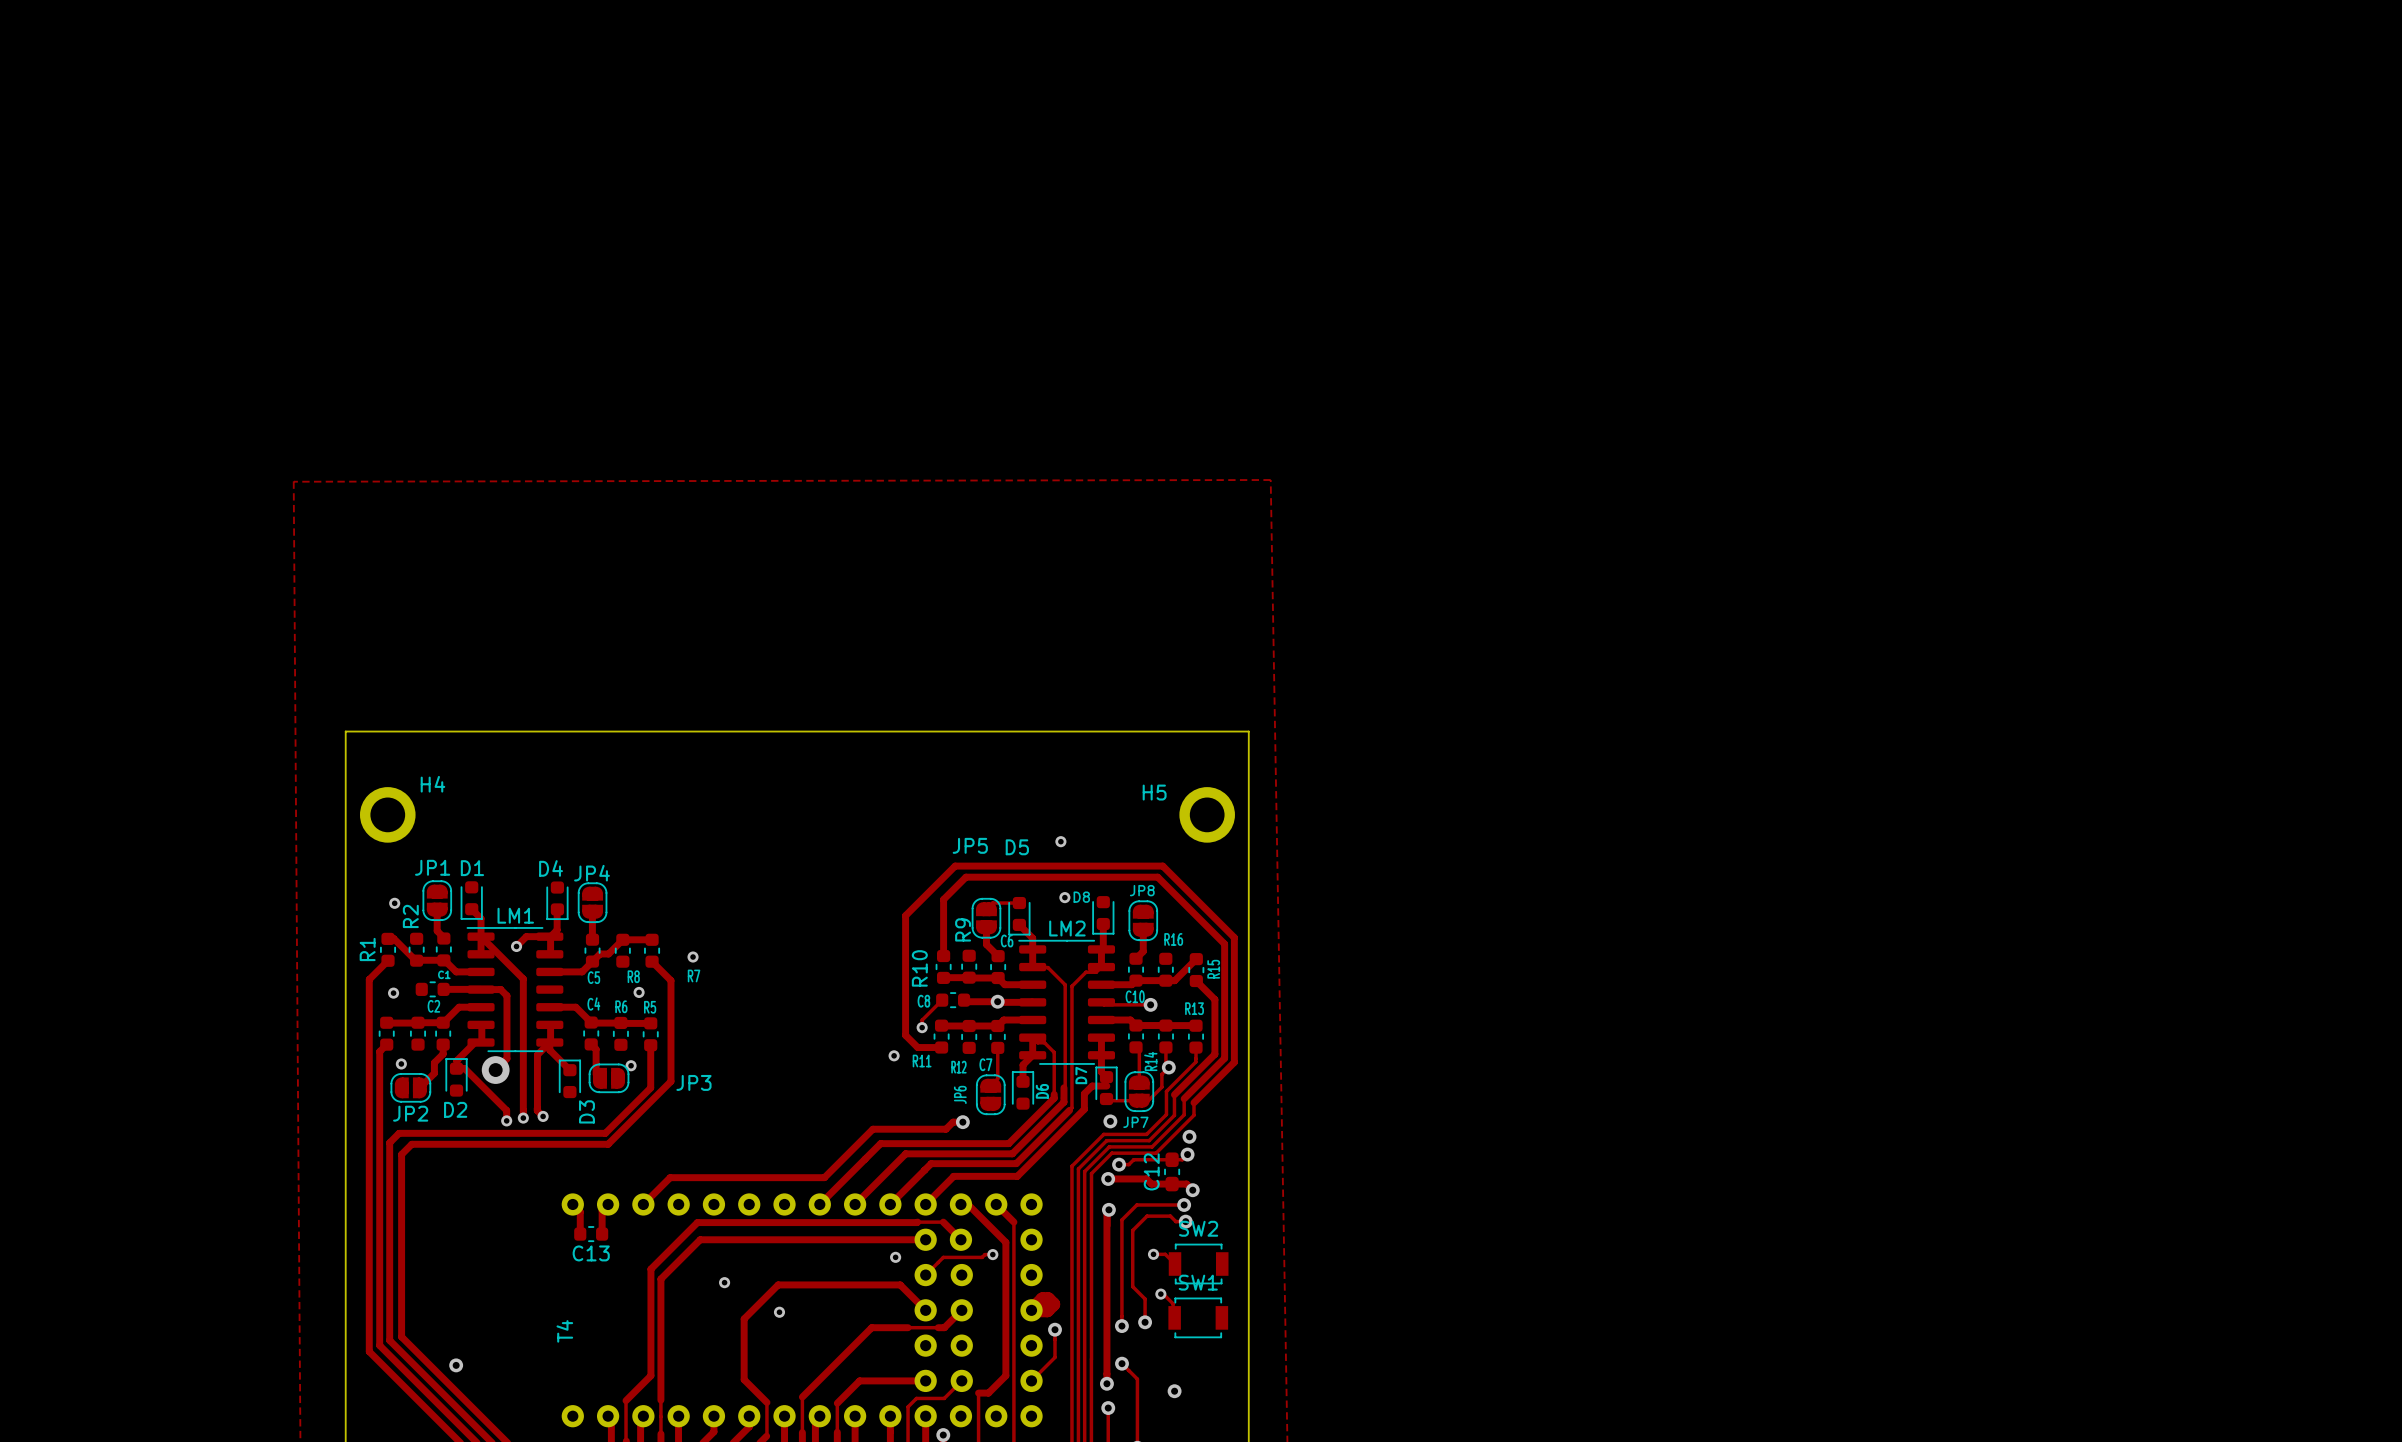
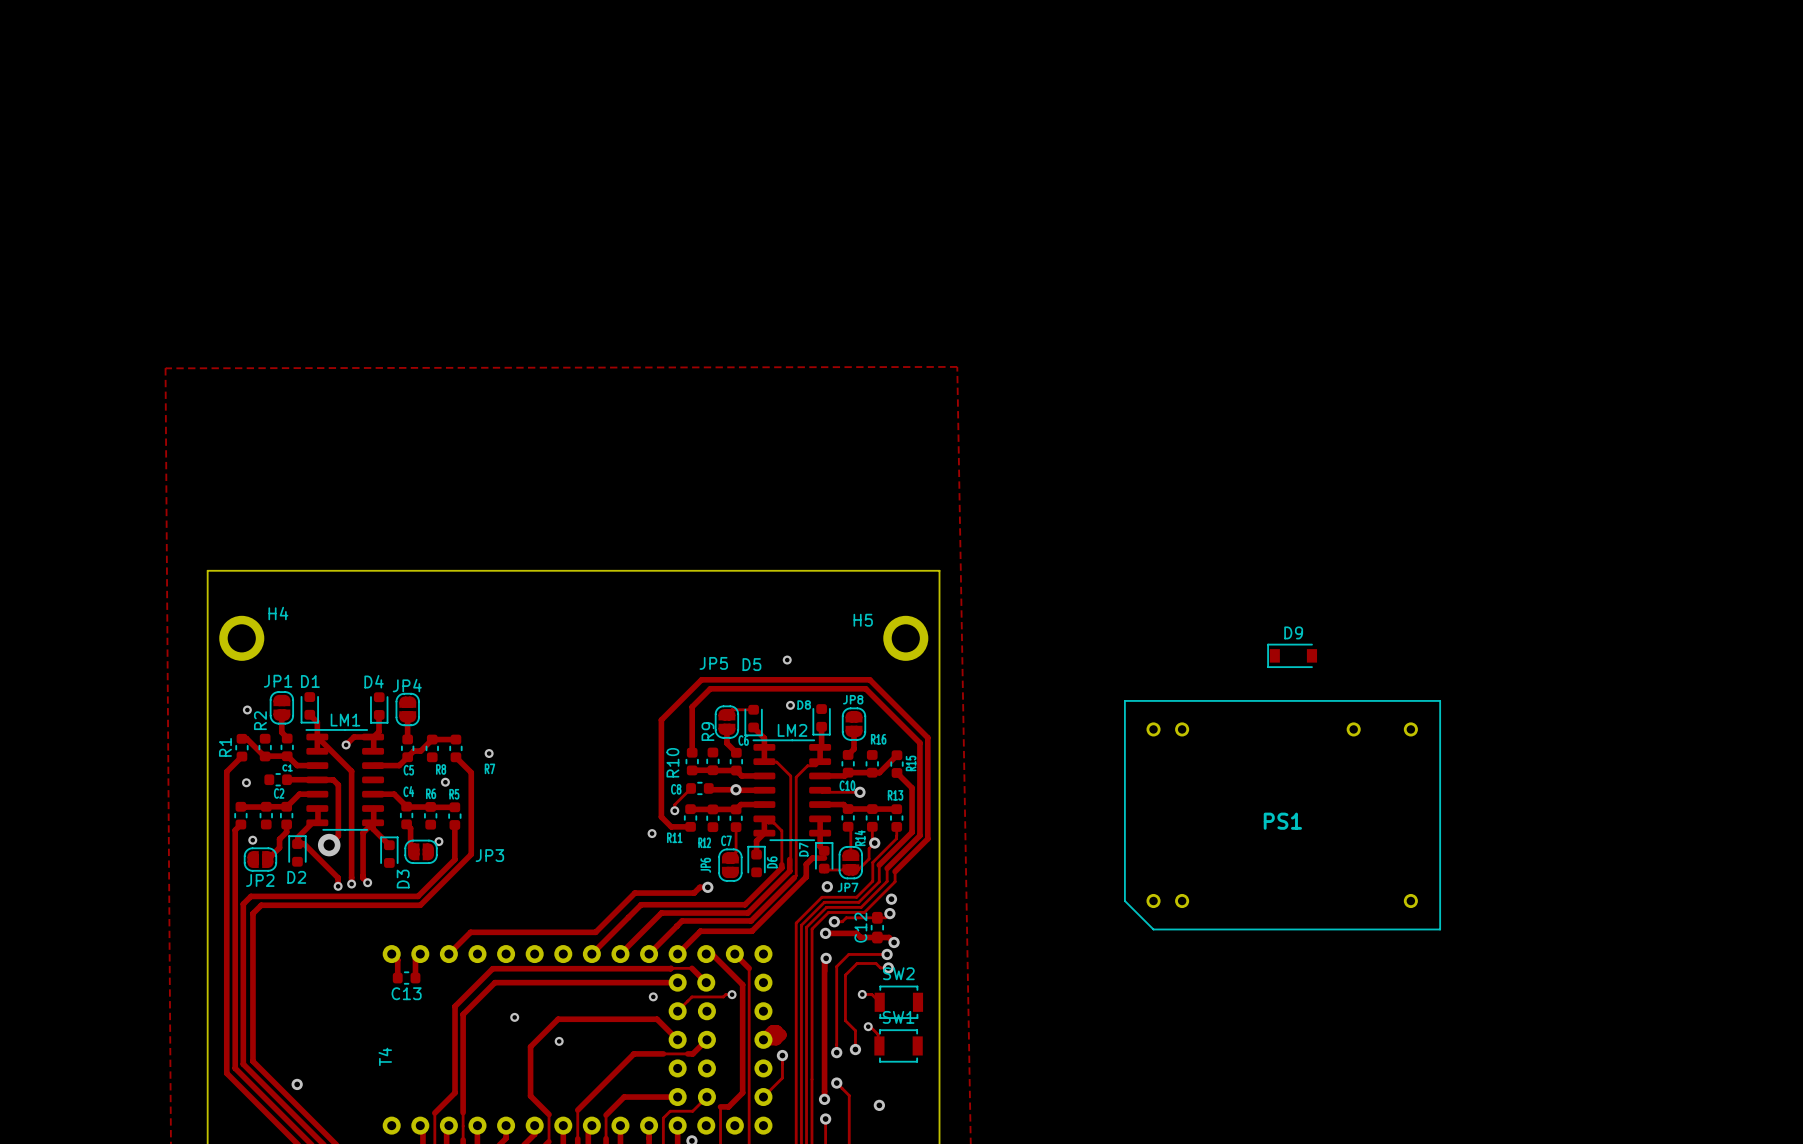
D9: none -> (1292, 655)
PS1: none -> (1282, 815)

